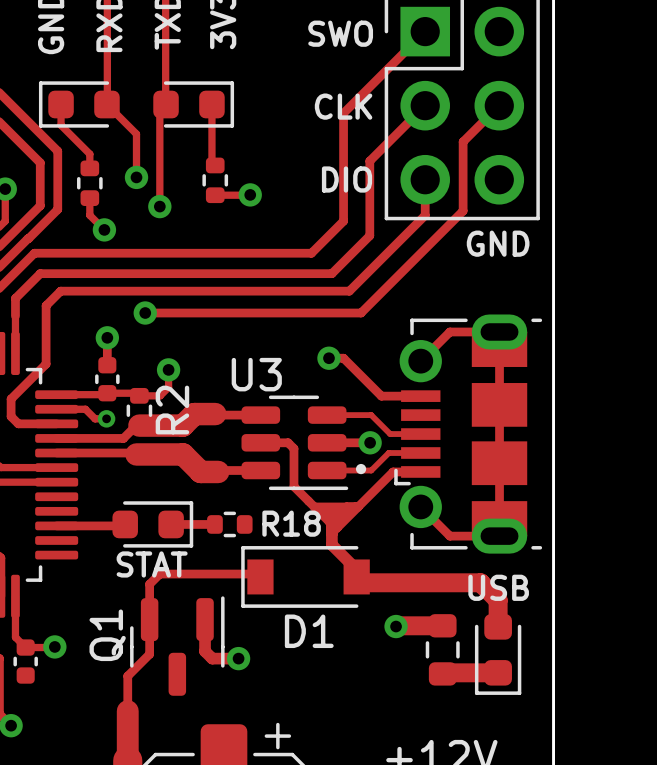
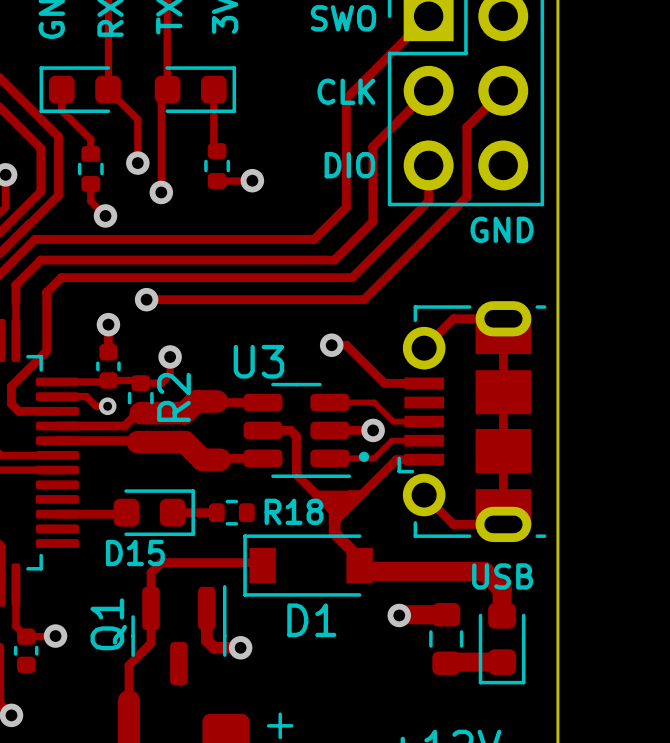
D15 name: none -> D15 (135, 552)
text: STAT (152, 564) -> none

